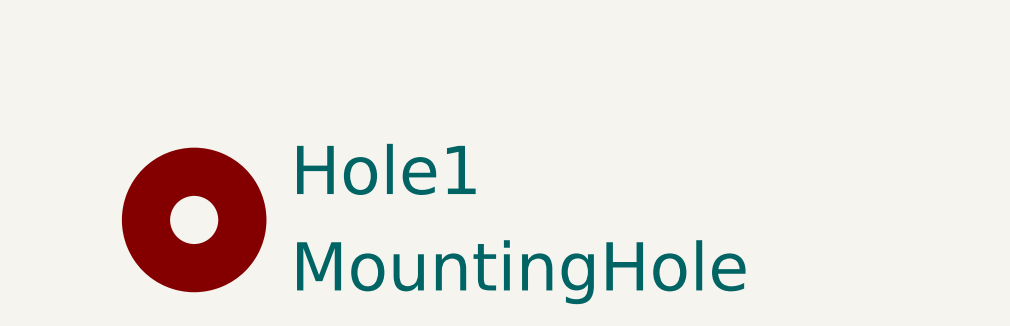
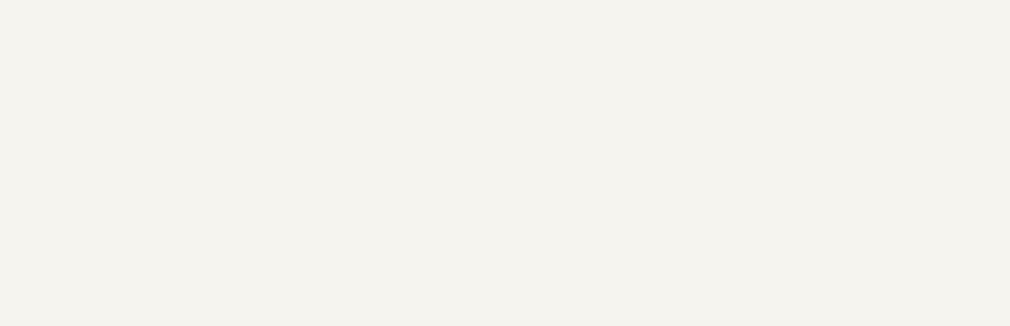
Hole1: MountingHole (194, 219) -> none

